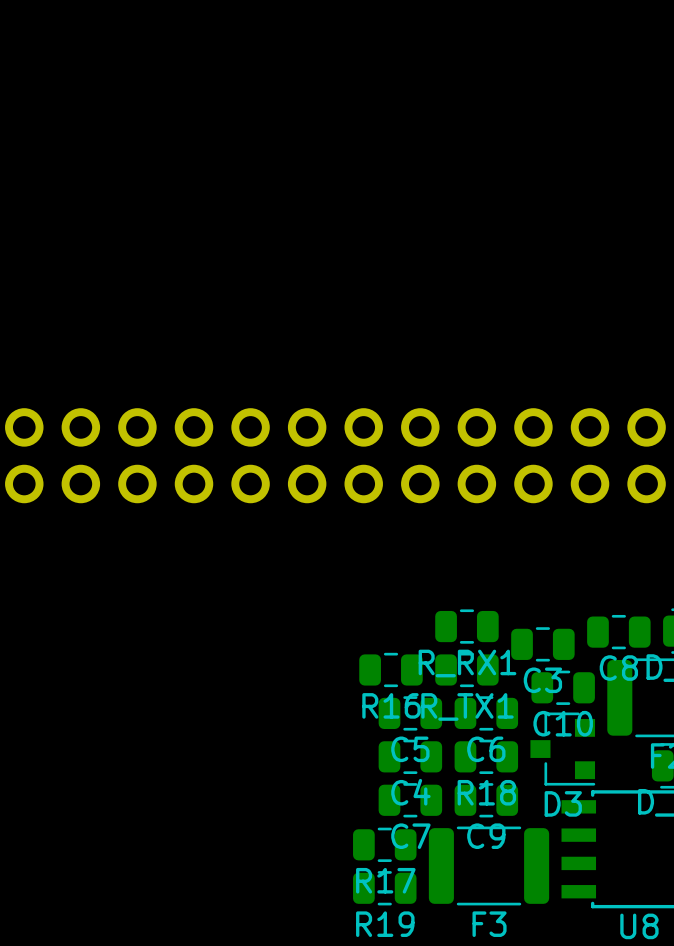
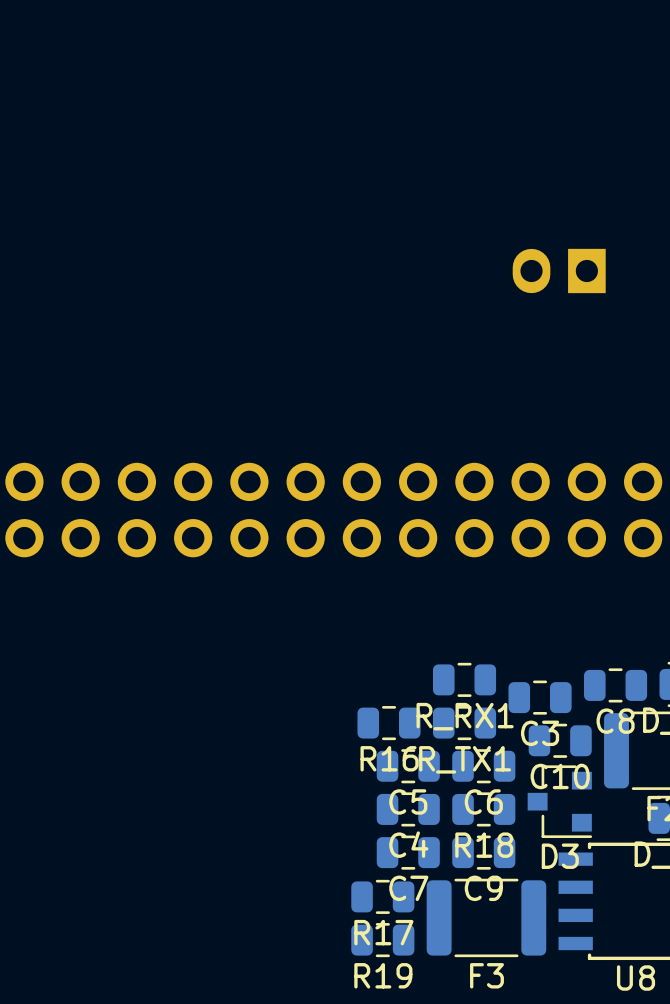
part: none -> (559, 271)

